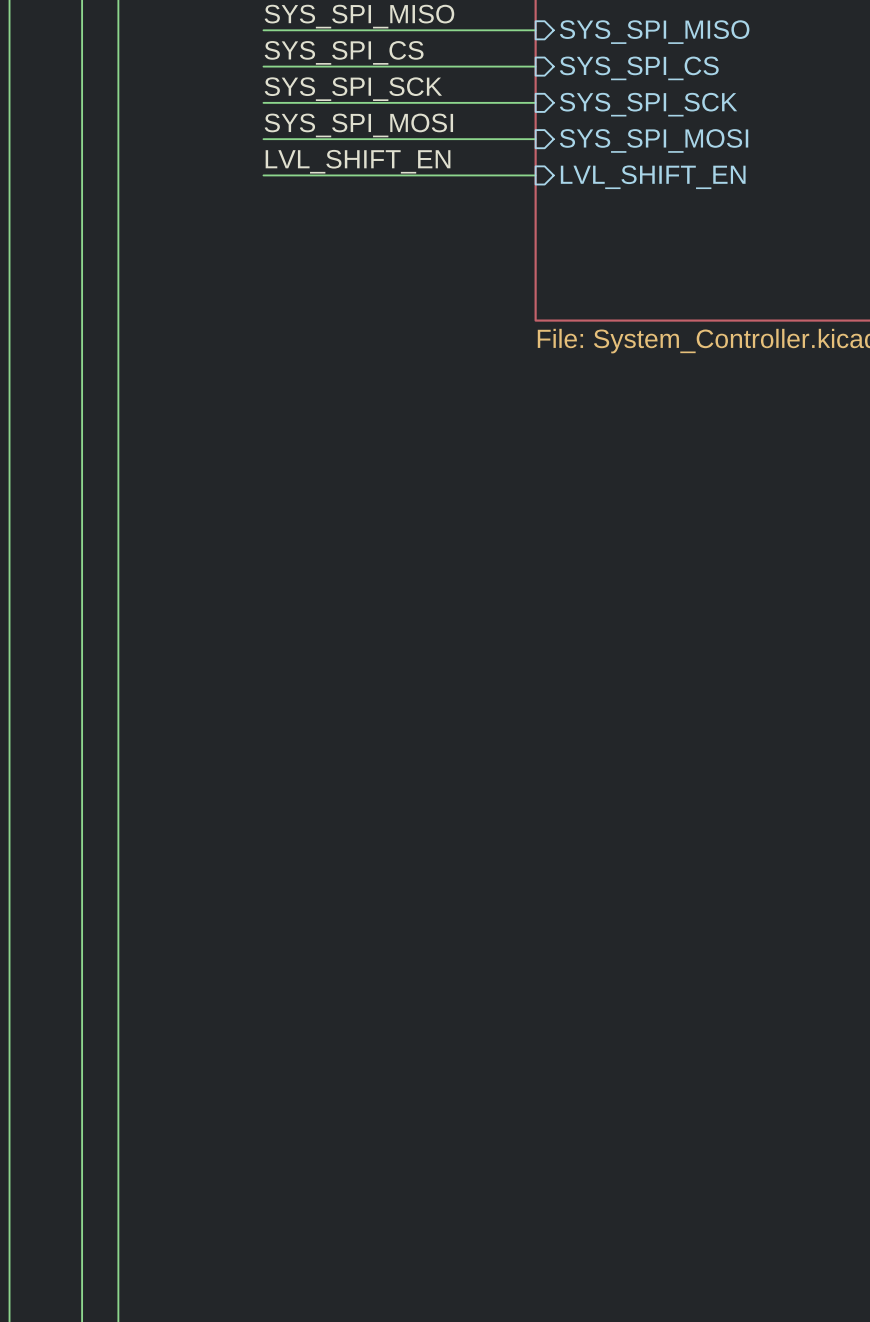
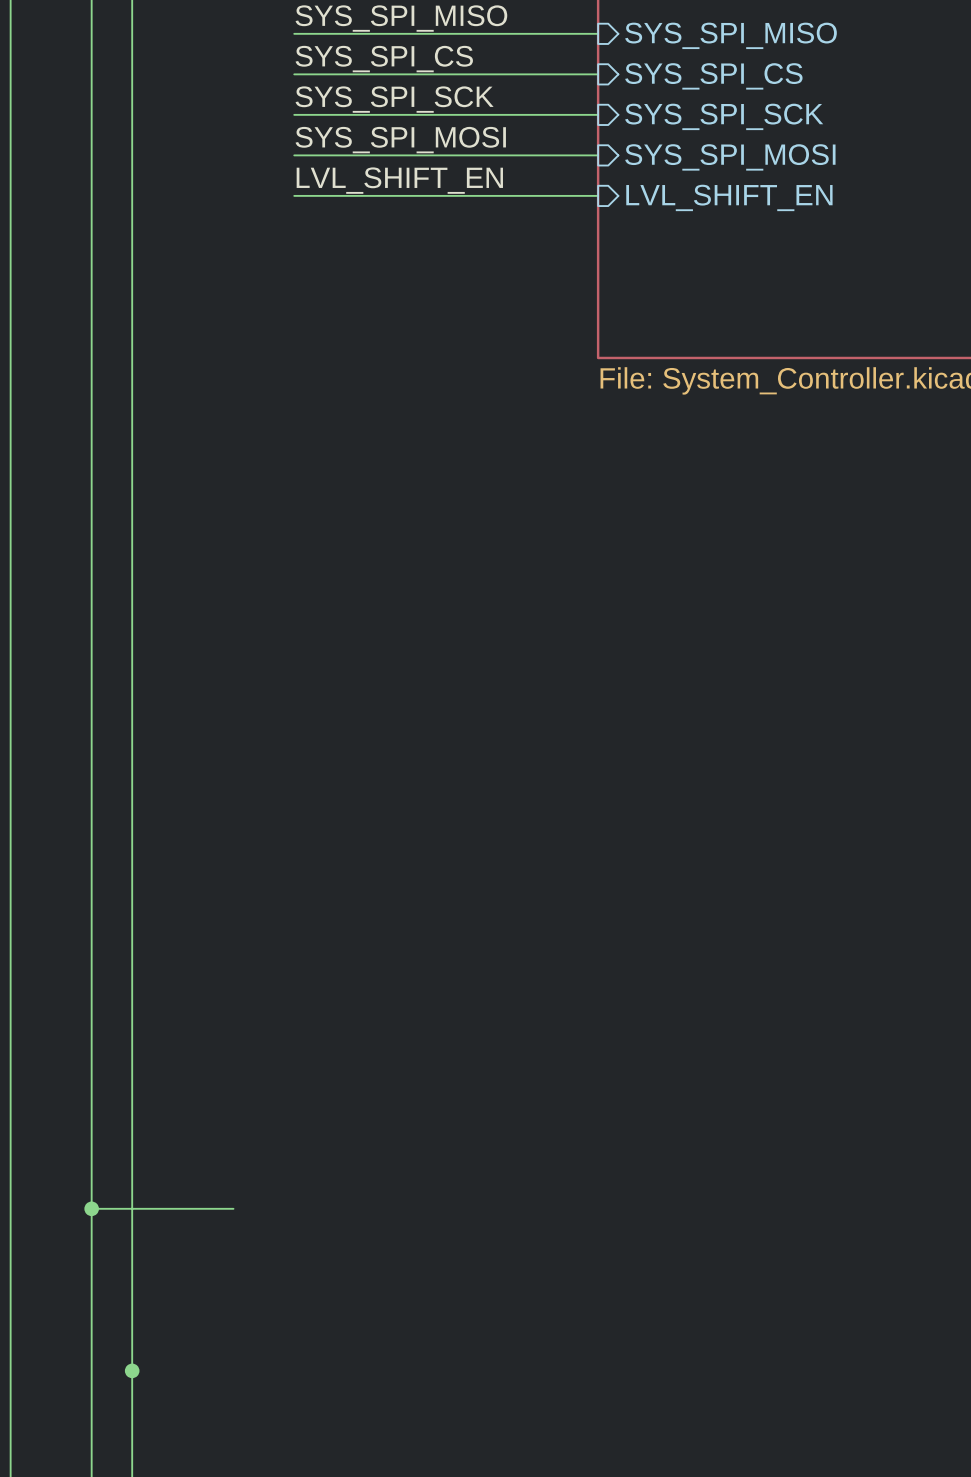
wire: none -> (91, 1208) (233, 1208)
junction: none -> (91, 1208)
junction: none -> (132, 1370)

